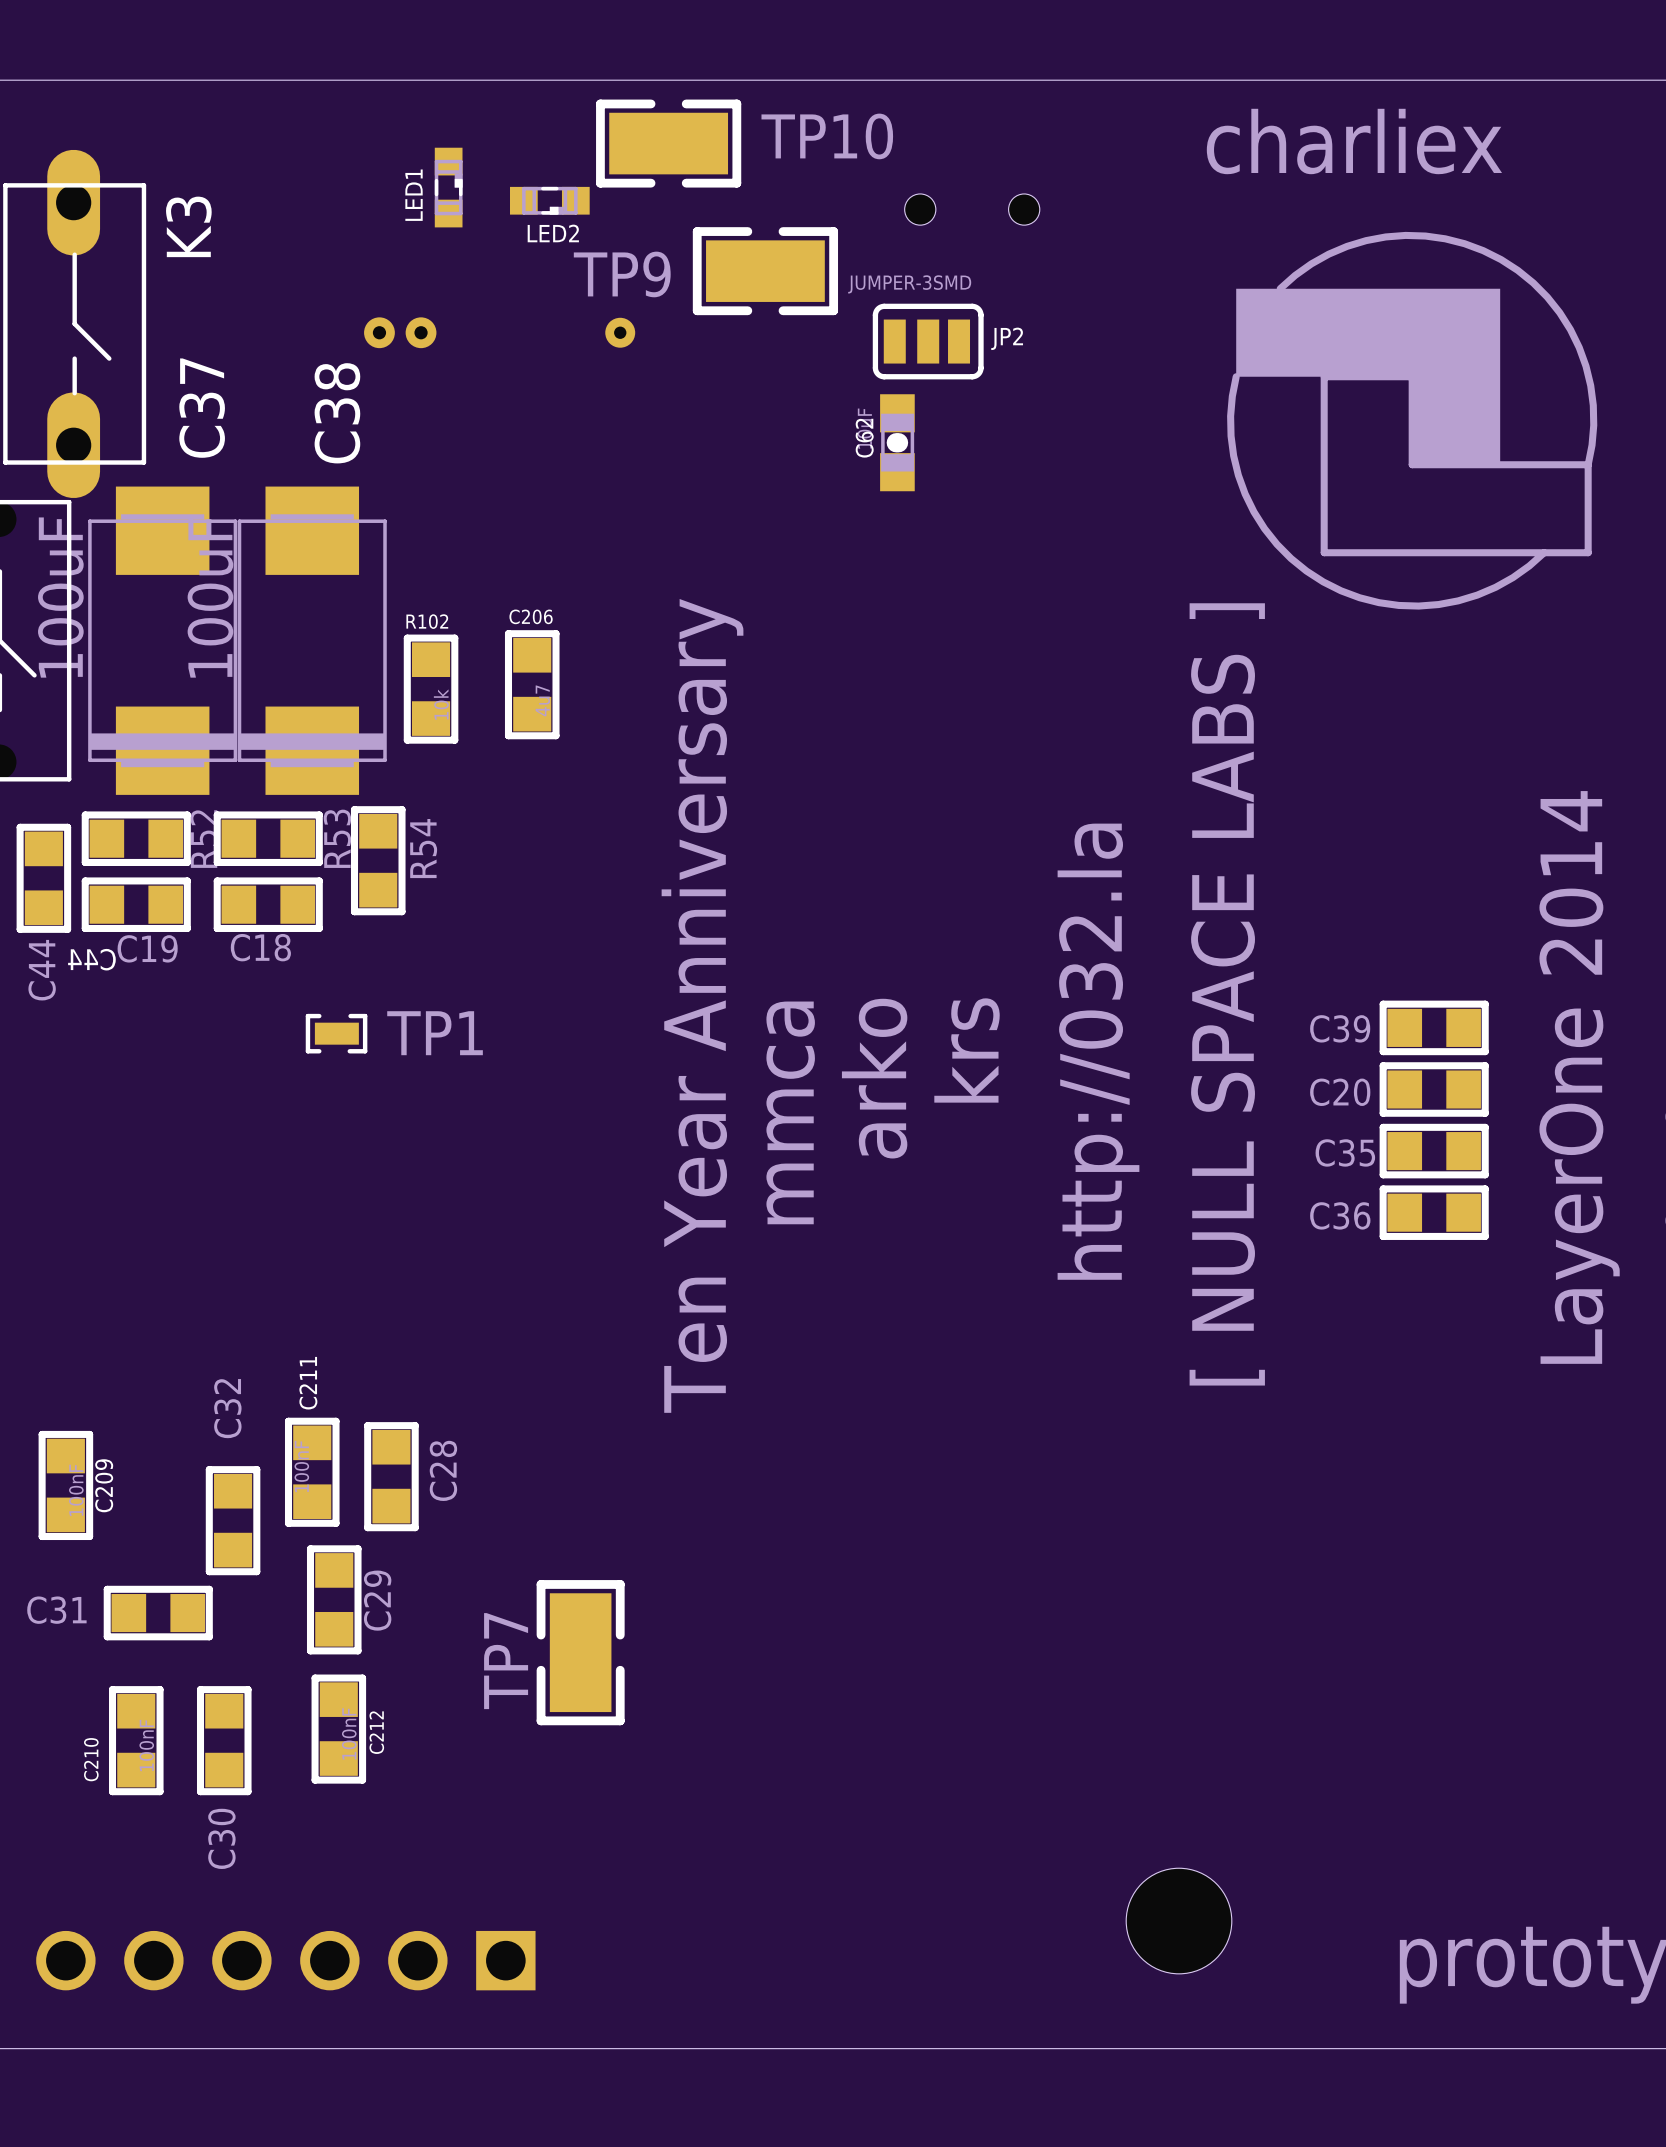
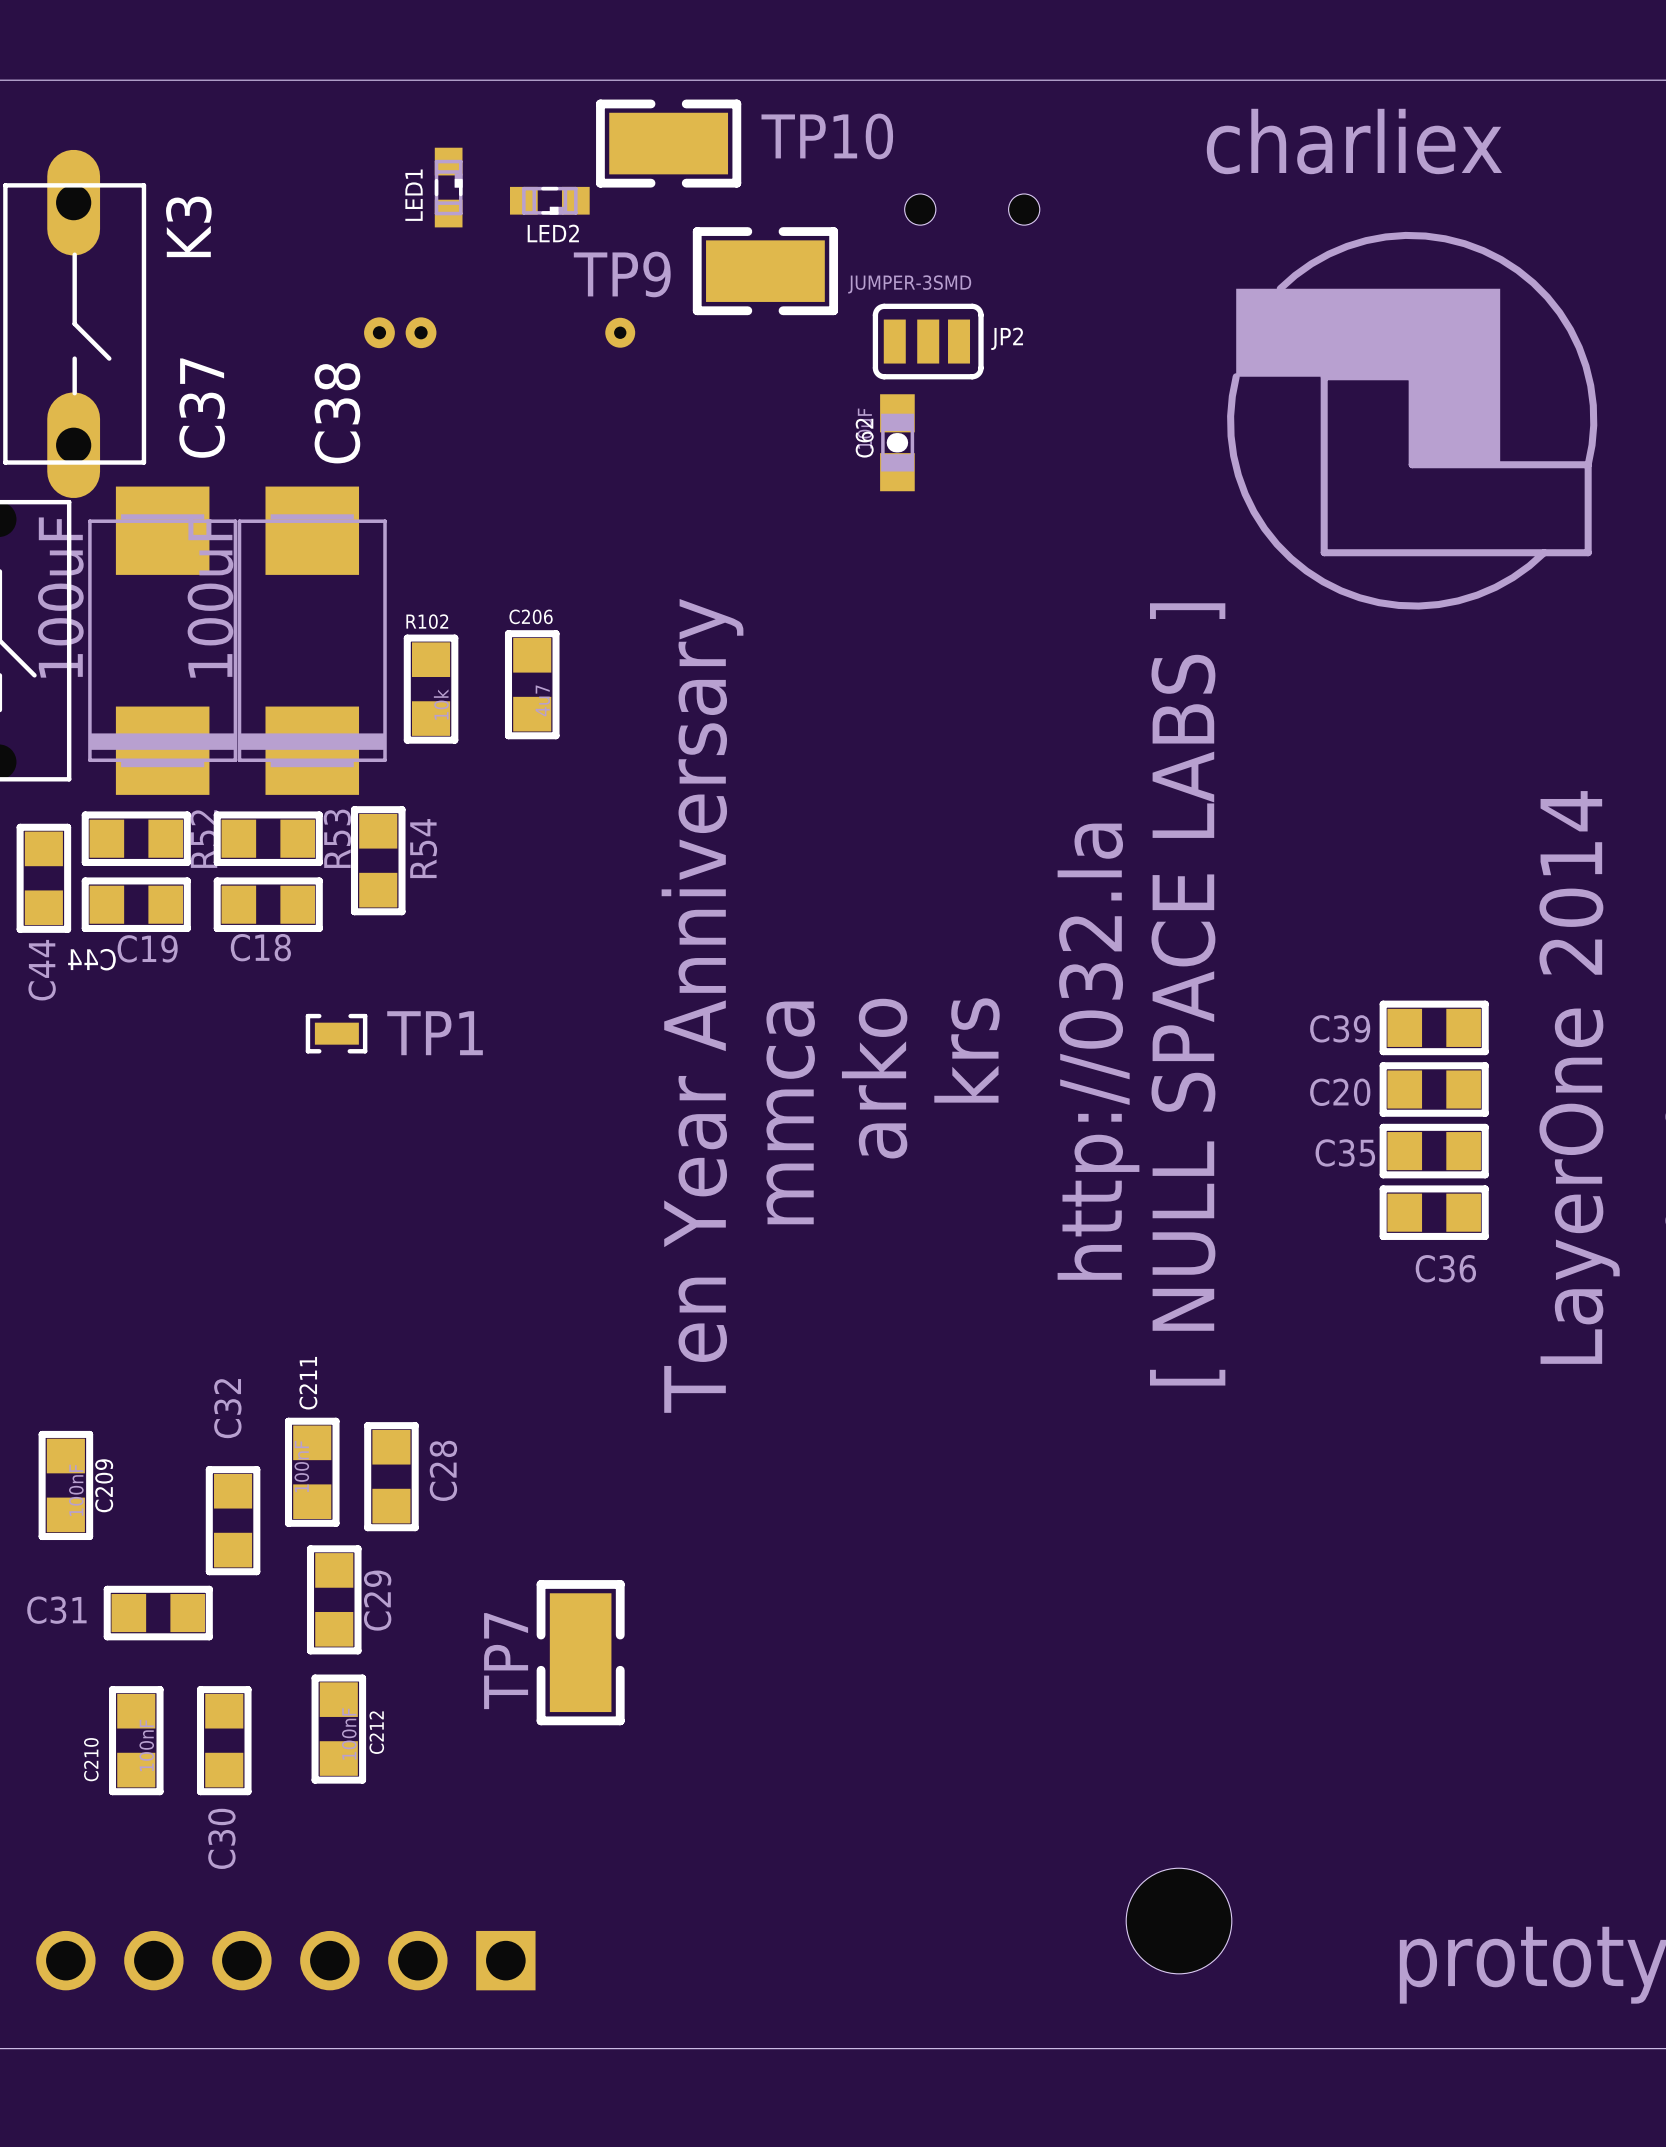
text position: [ NULL SPACE LABS ] (1227, 994) -> [ NULL SPACE LABS ] (1187, 994)
C36 name position: C36 (1340, 1215) -> C36 (1445, 1268)

